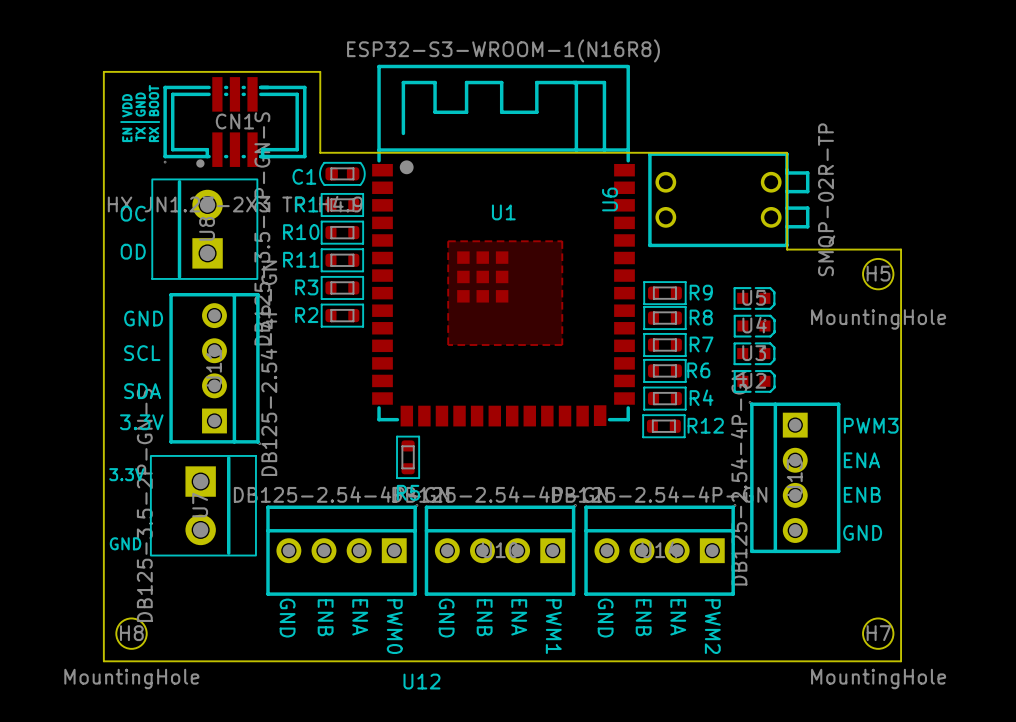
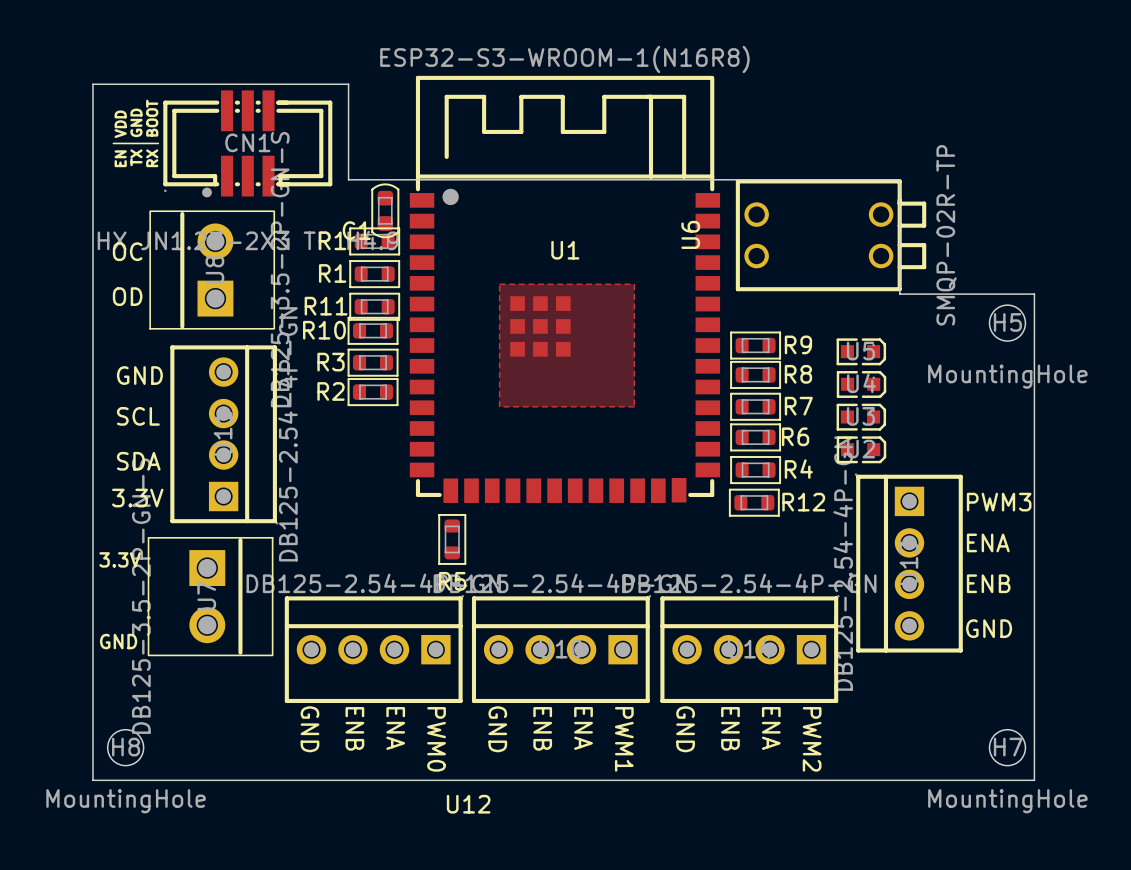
C1 rotation: 0° (342, 173) -> 90° clockwise (385, 210)
R10 name: R10 (301, 232) -> R1 (332, 273)
R10: none -> (373, 330)
R3 position: (342, 287) -> (373, 362)
R2 position: (342, 315) -> (373, 392)

